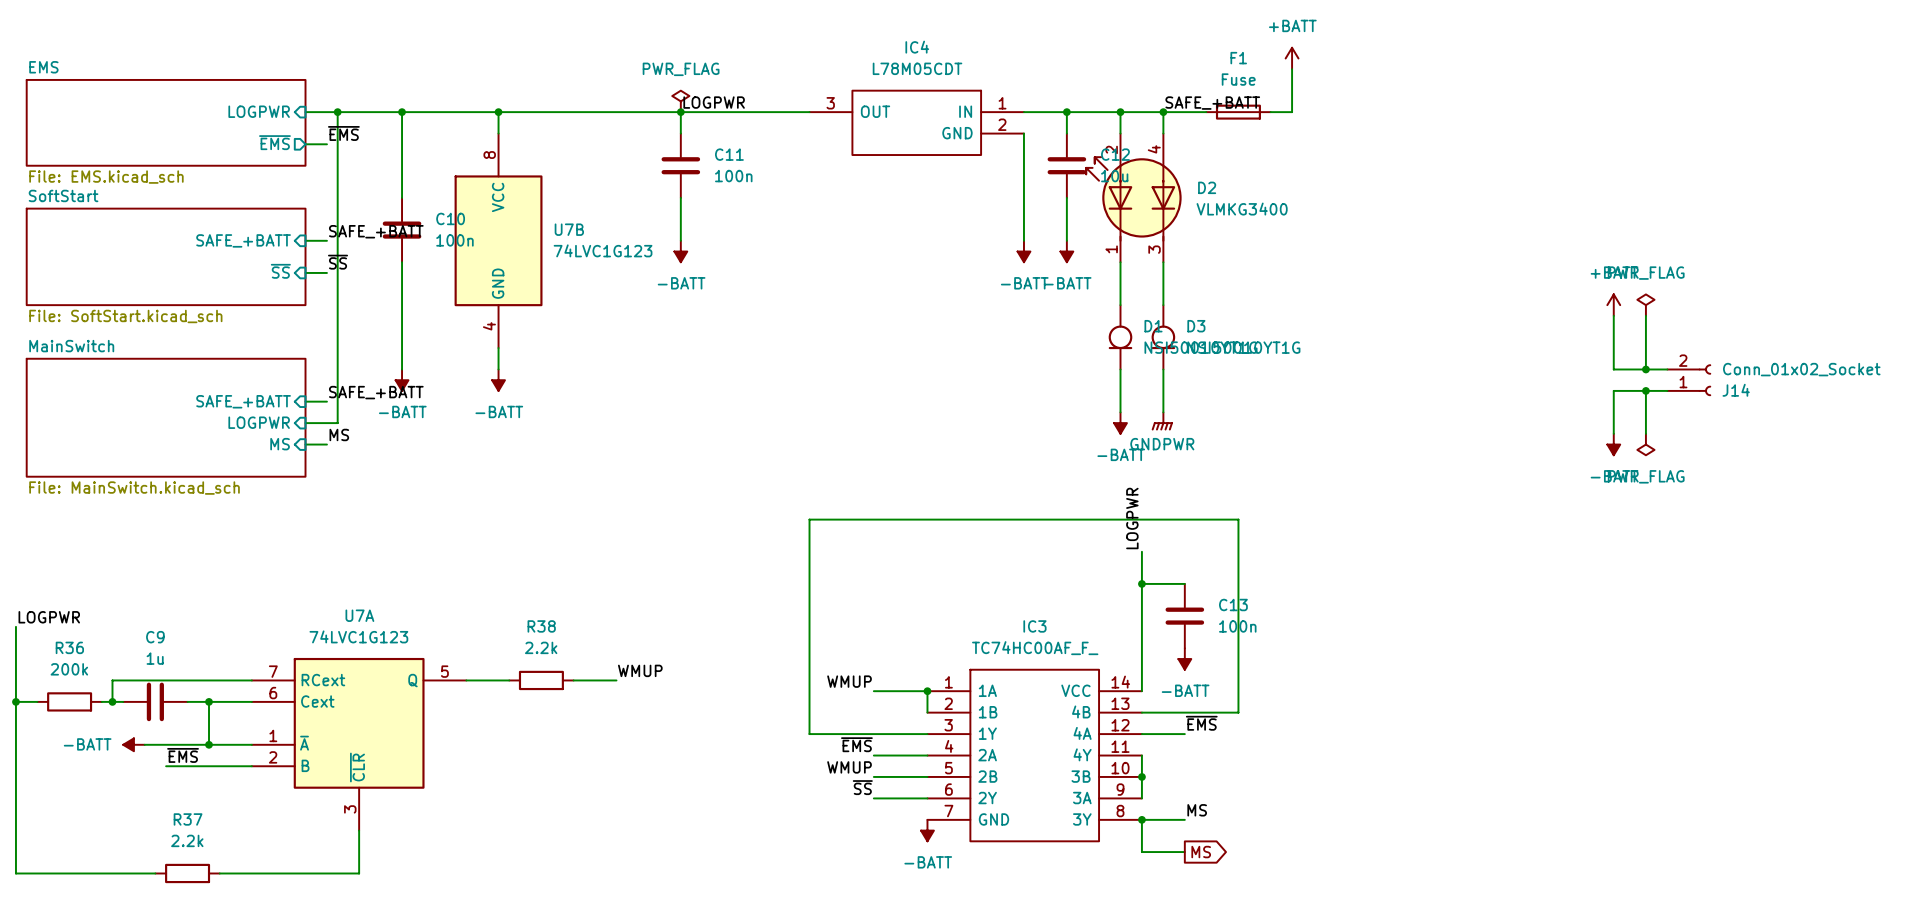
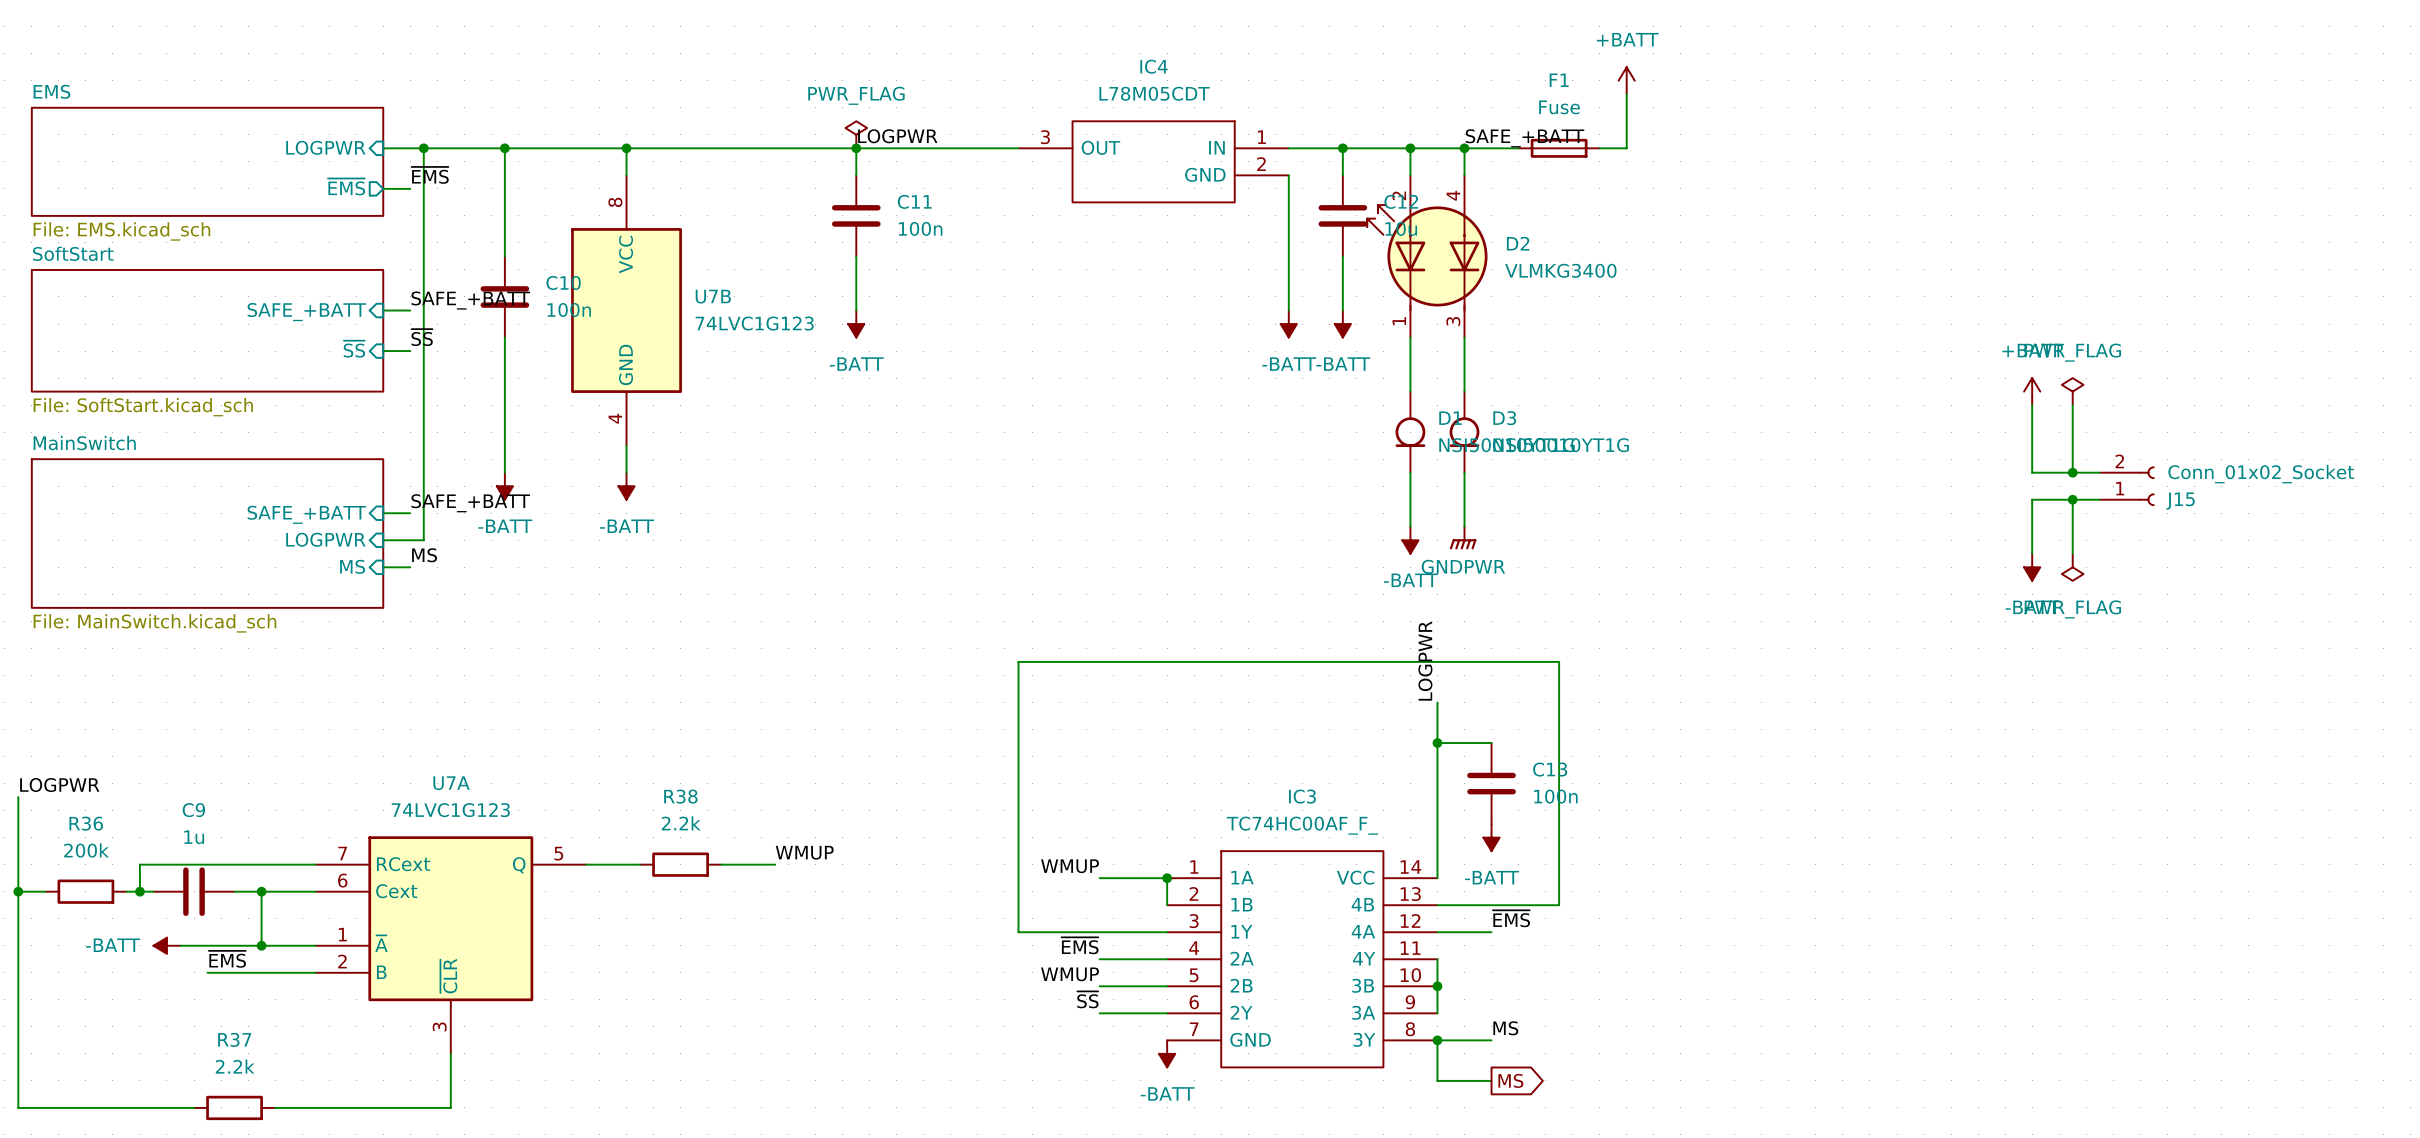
J14 name: J14 (1736, 390) -> J15 (2180, 501)

